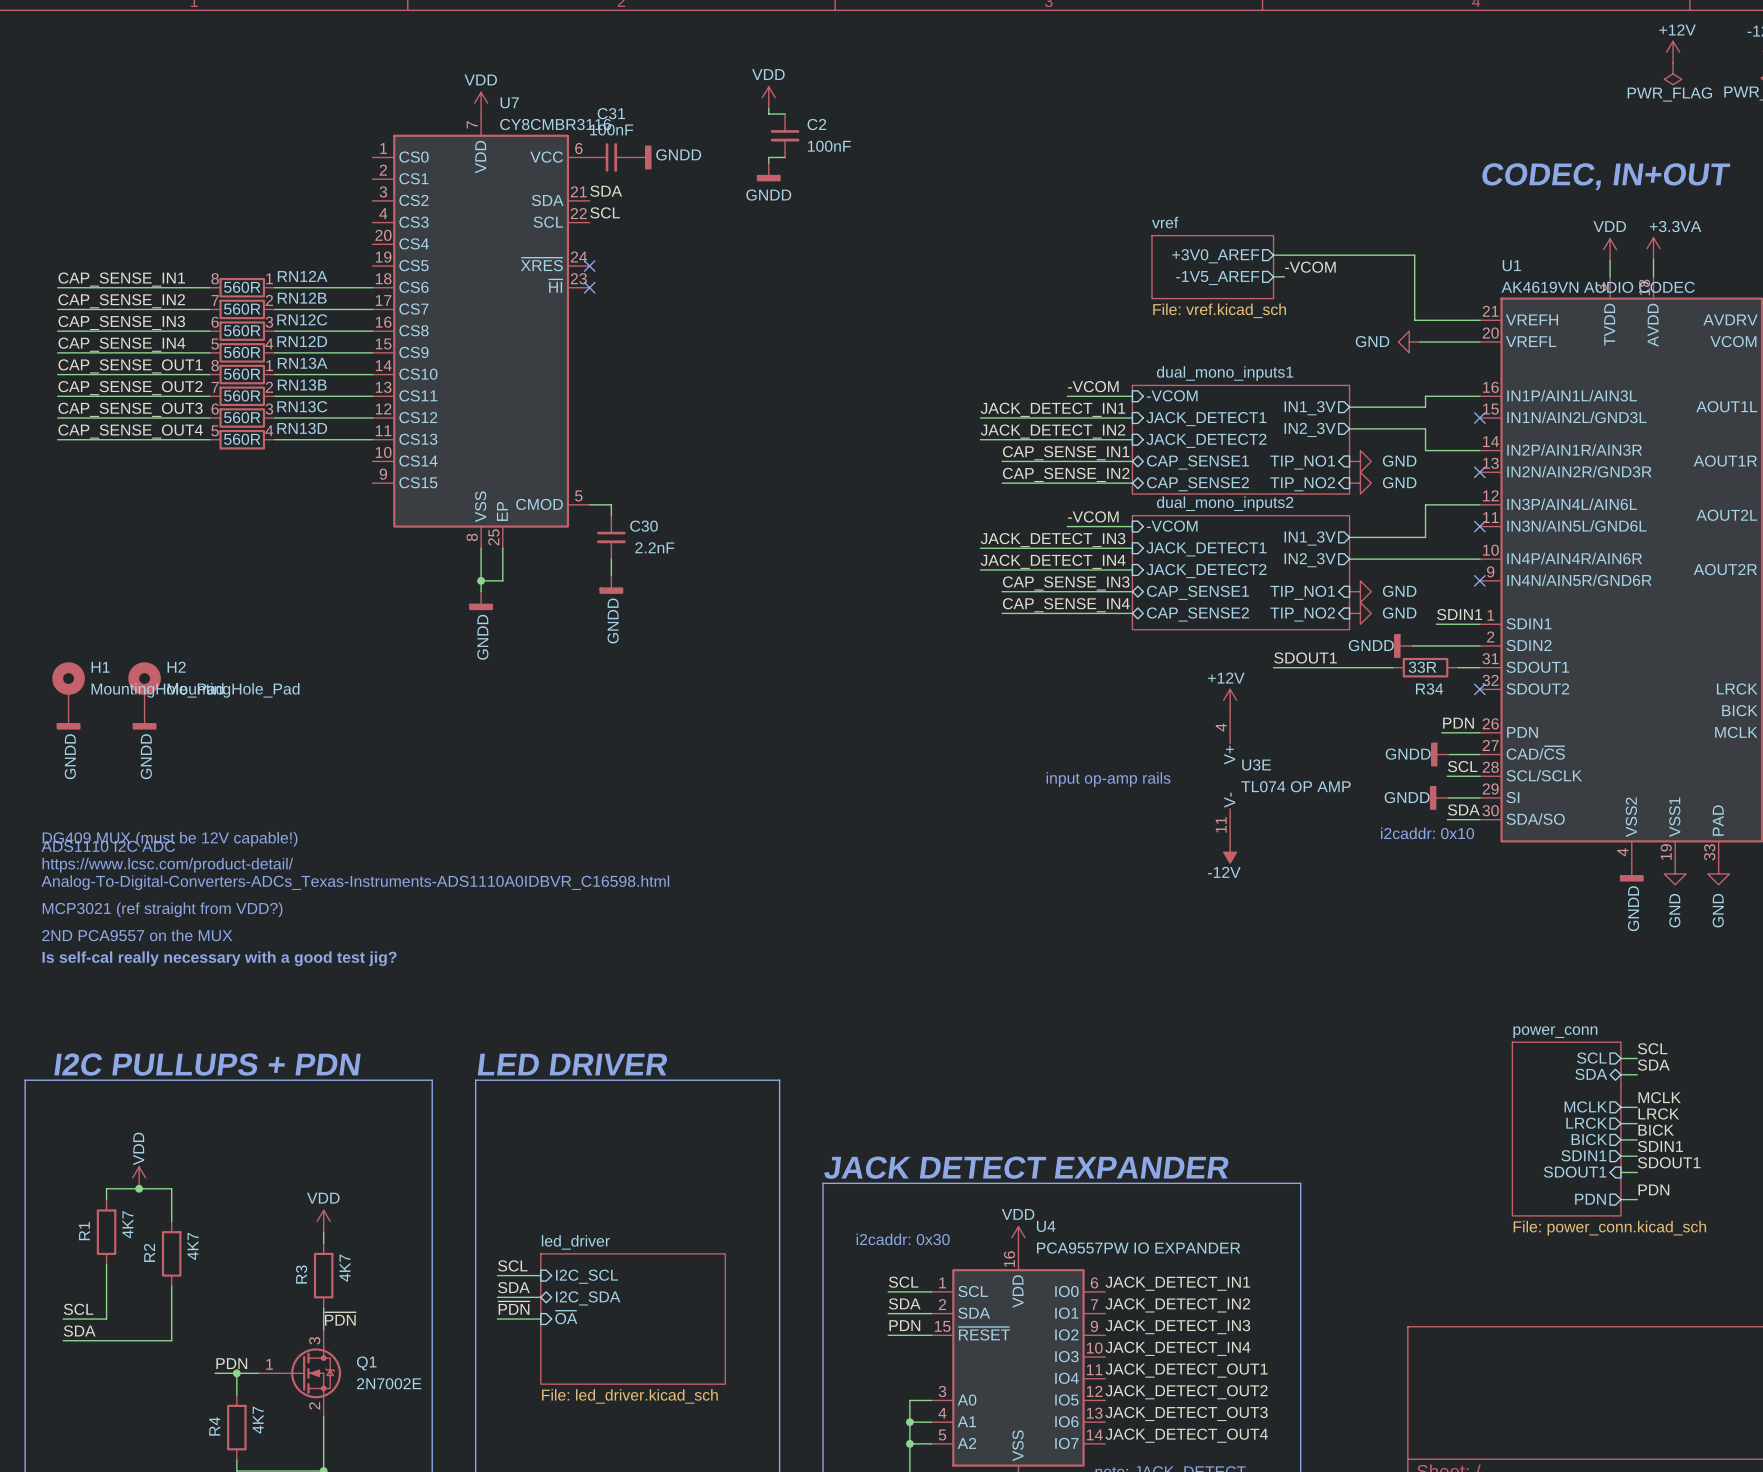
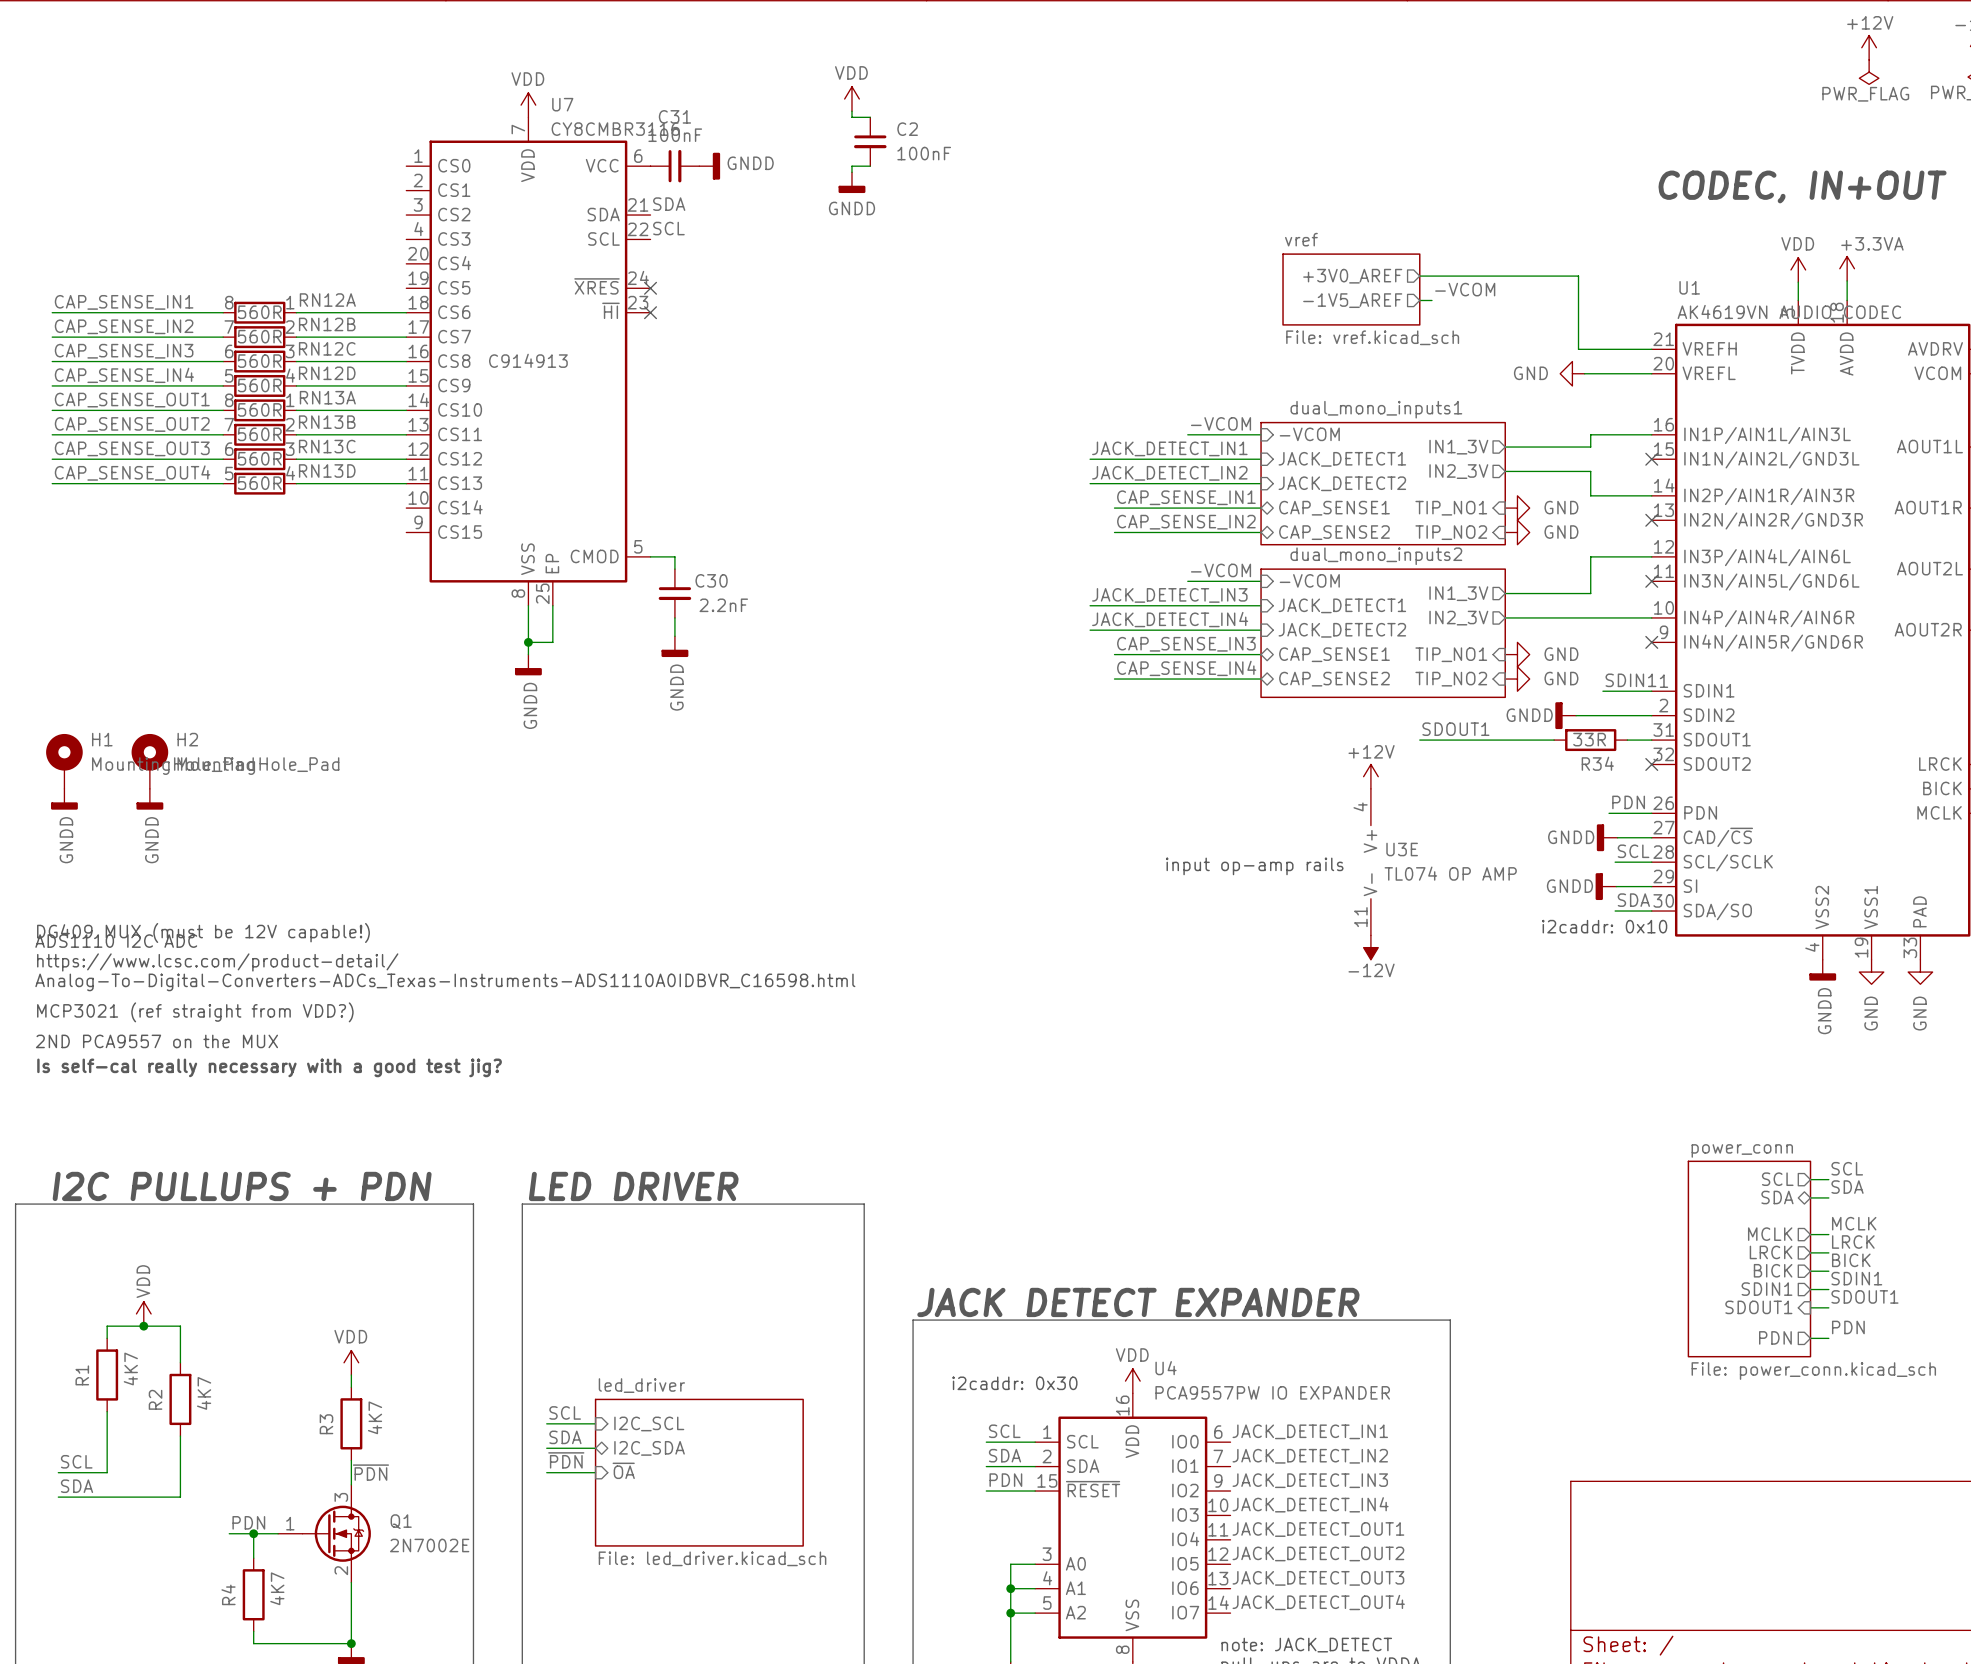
U7 text: none -> C914913 (528, 360)

